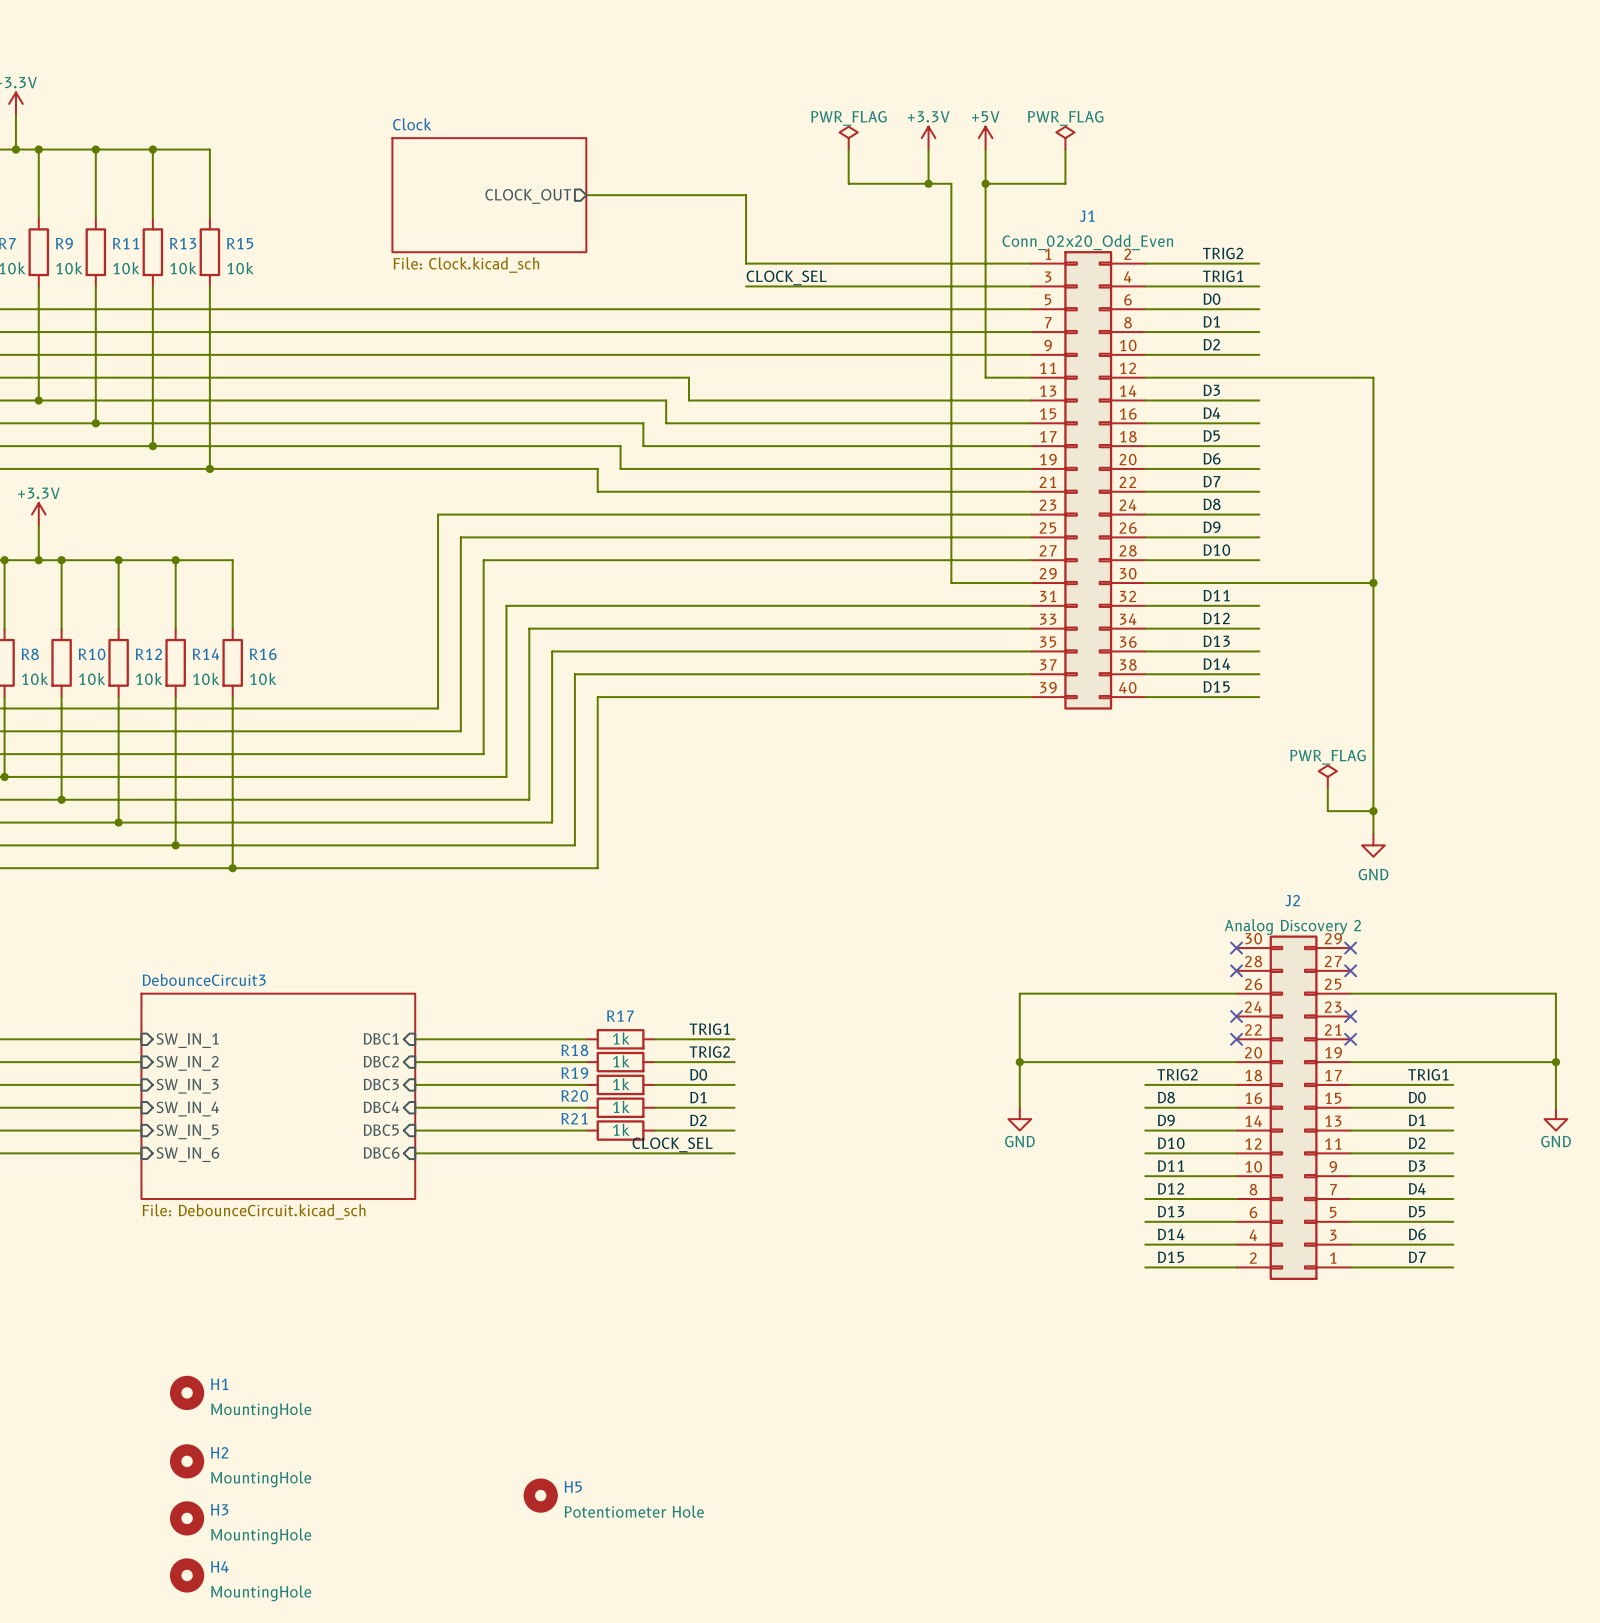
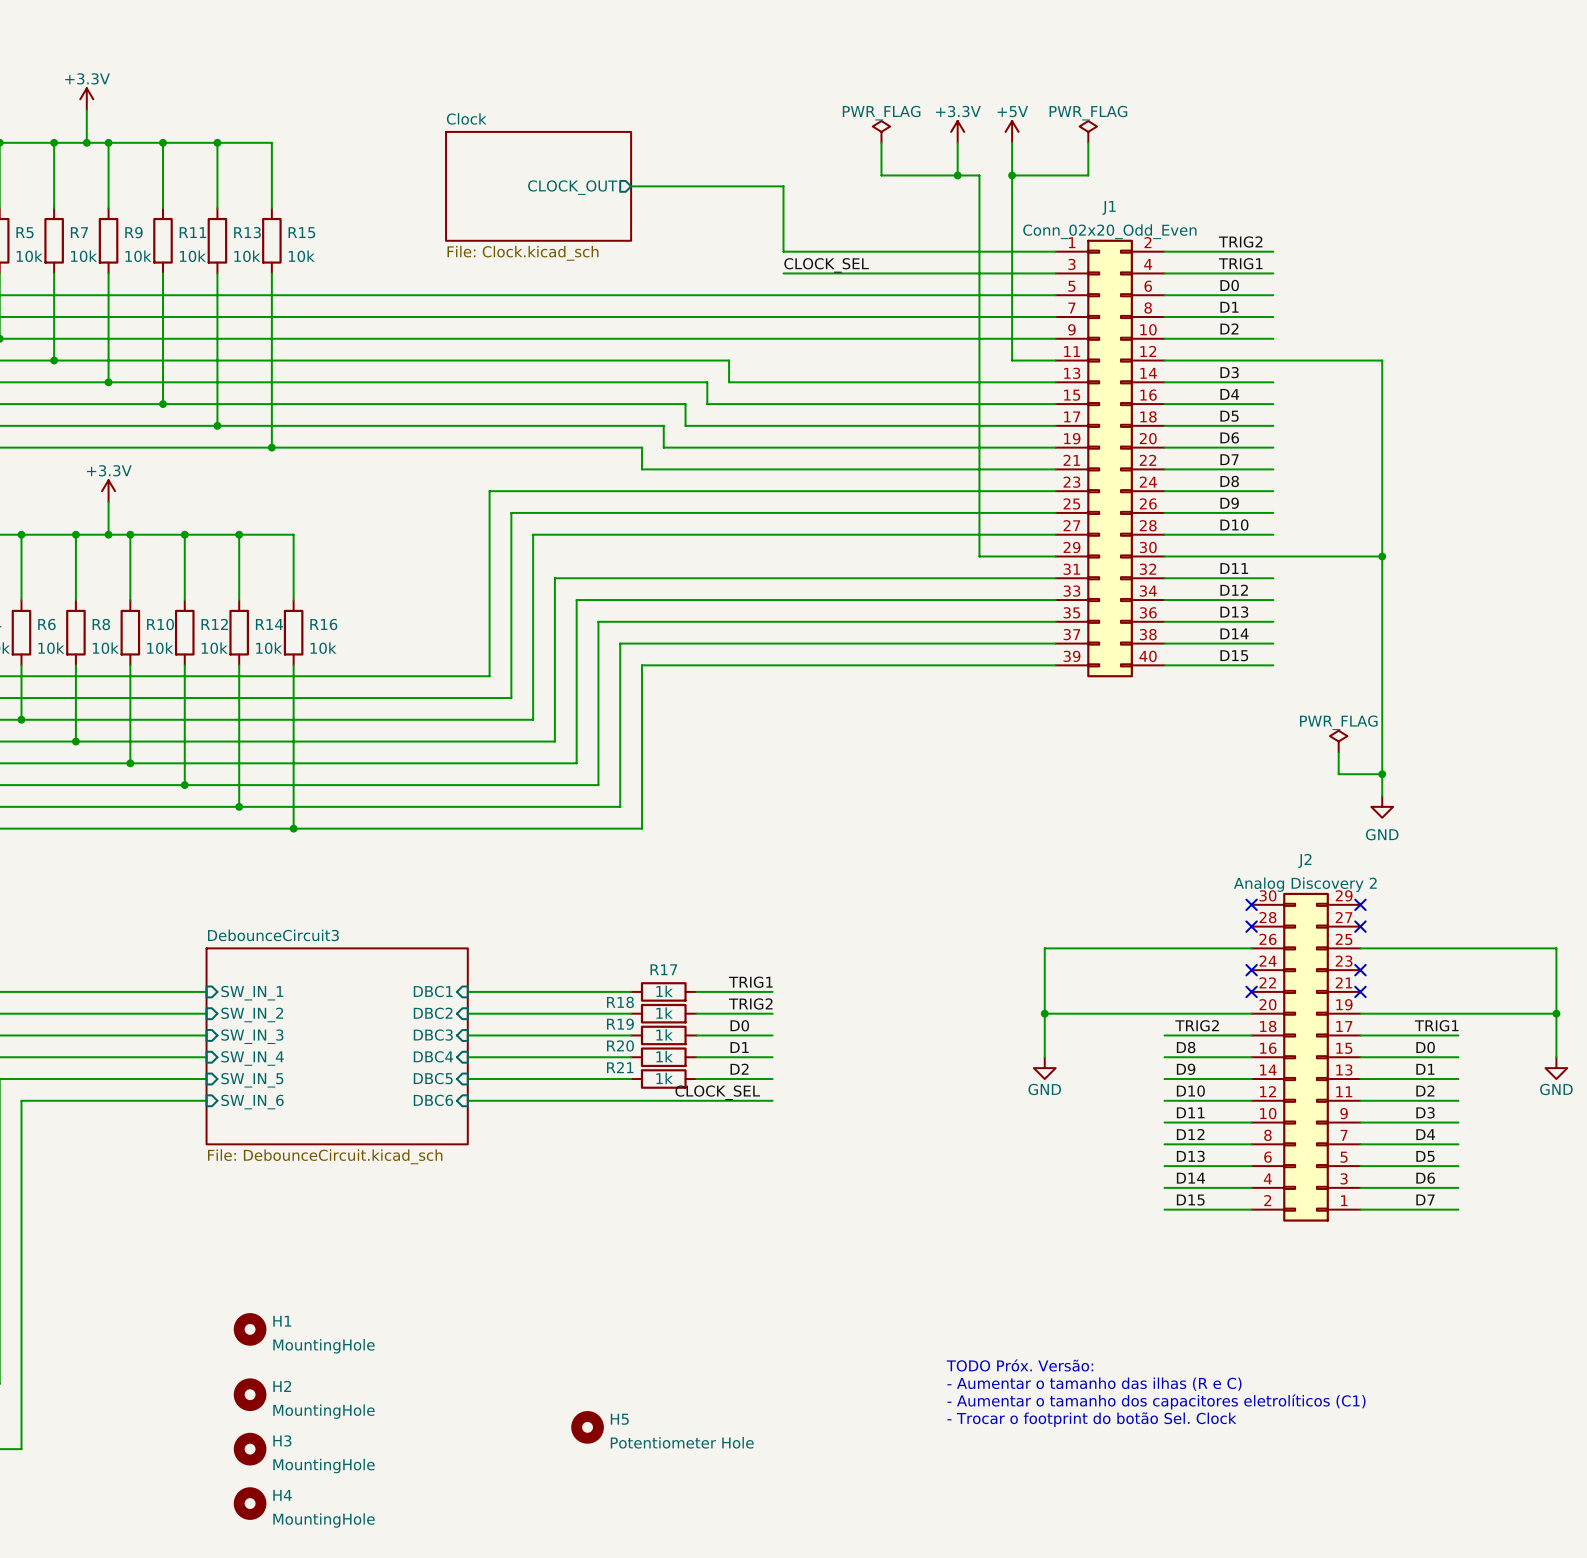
text: none -> TODO Próx. Versão: (1019, 1365)
text: none -> - Aumentar o tamanho das ilhas (R e C) (1094, 1384)
text: none -> - Aumentar o tamanho dos capacitores eletrolíticos (C1) (1156, 1401)
text: none -> - Trocar o footprint do botão Sel. Clock (1091, 1419)

